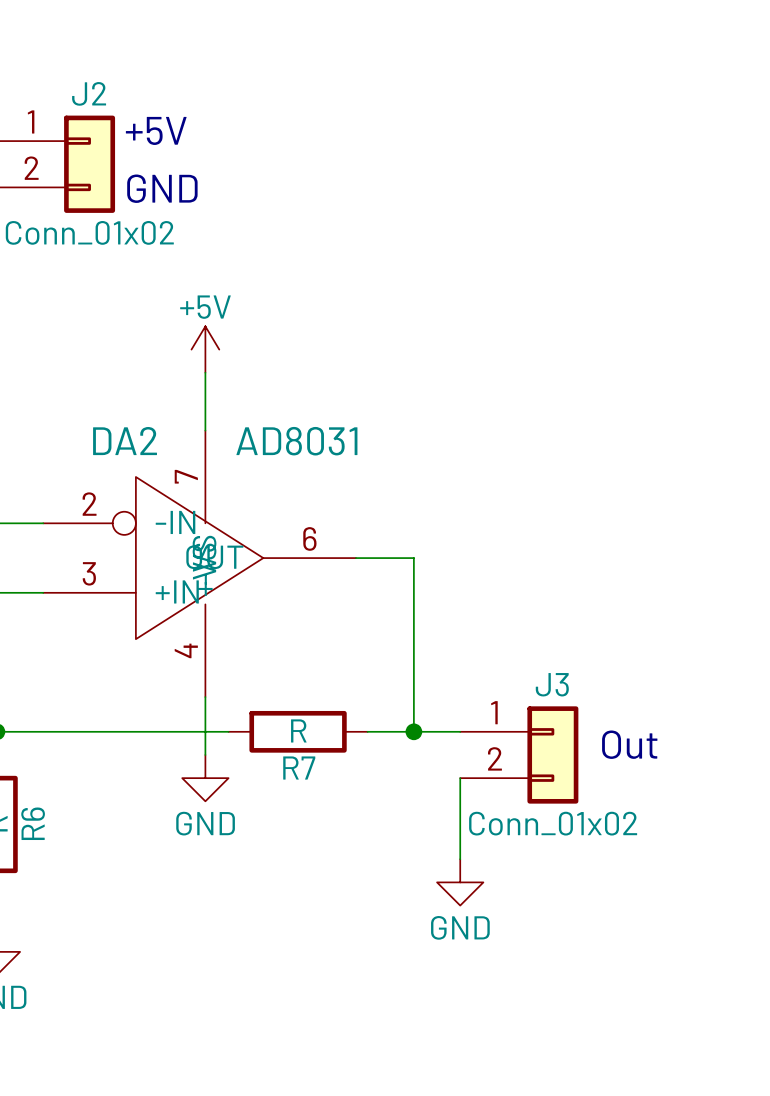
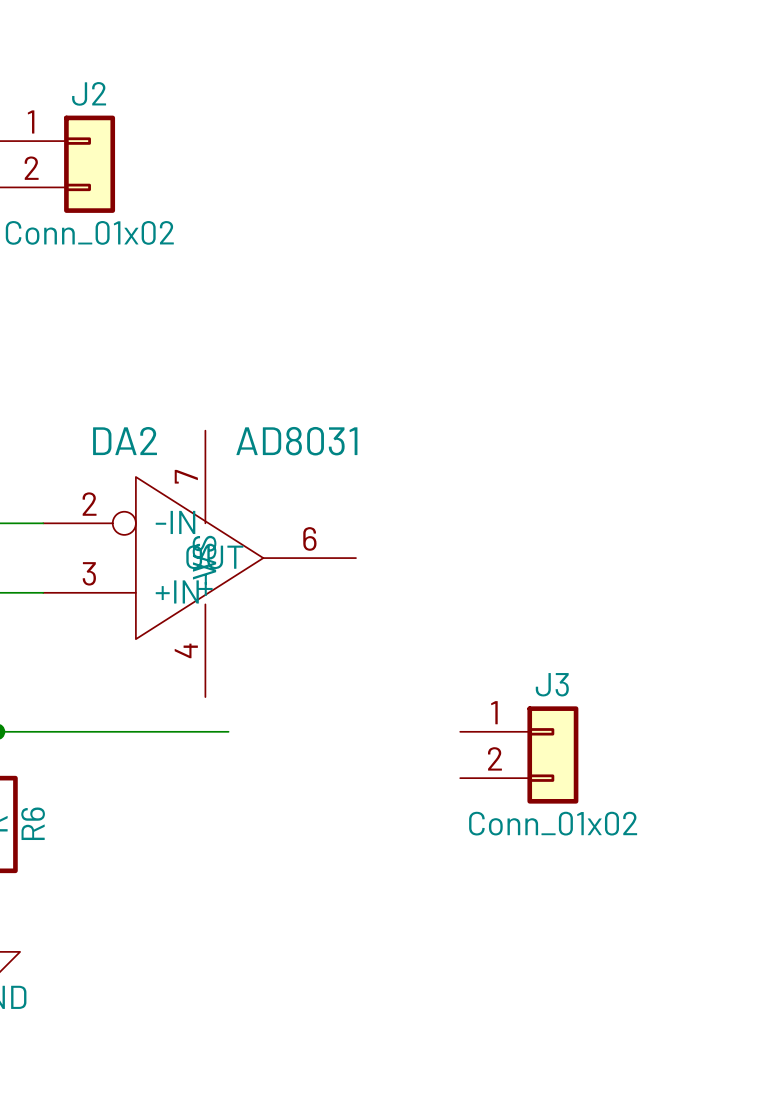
text: +5V (156, 130) -> none
text: GND (162, 188) -> none
power symbol: +5V (205, 349) -> none
wire: (205, 372) (205, 430) -> none
wire: (355, 558) (413, 558) (413, 731) -> none
wire: (205, 697) (205, 754) -> none
R7: R (298, 731) -> none
wire: (367, 731) (460, 731) -> none
junction: (413, 731) -> none
text: Out (629, 744) -> none
power symbol: GND (205, 778) -> none
wire: (460, 778) (460, 859) -> none
power symbol: GND (460, 882) -> none

